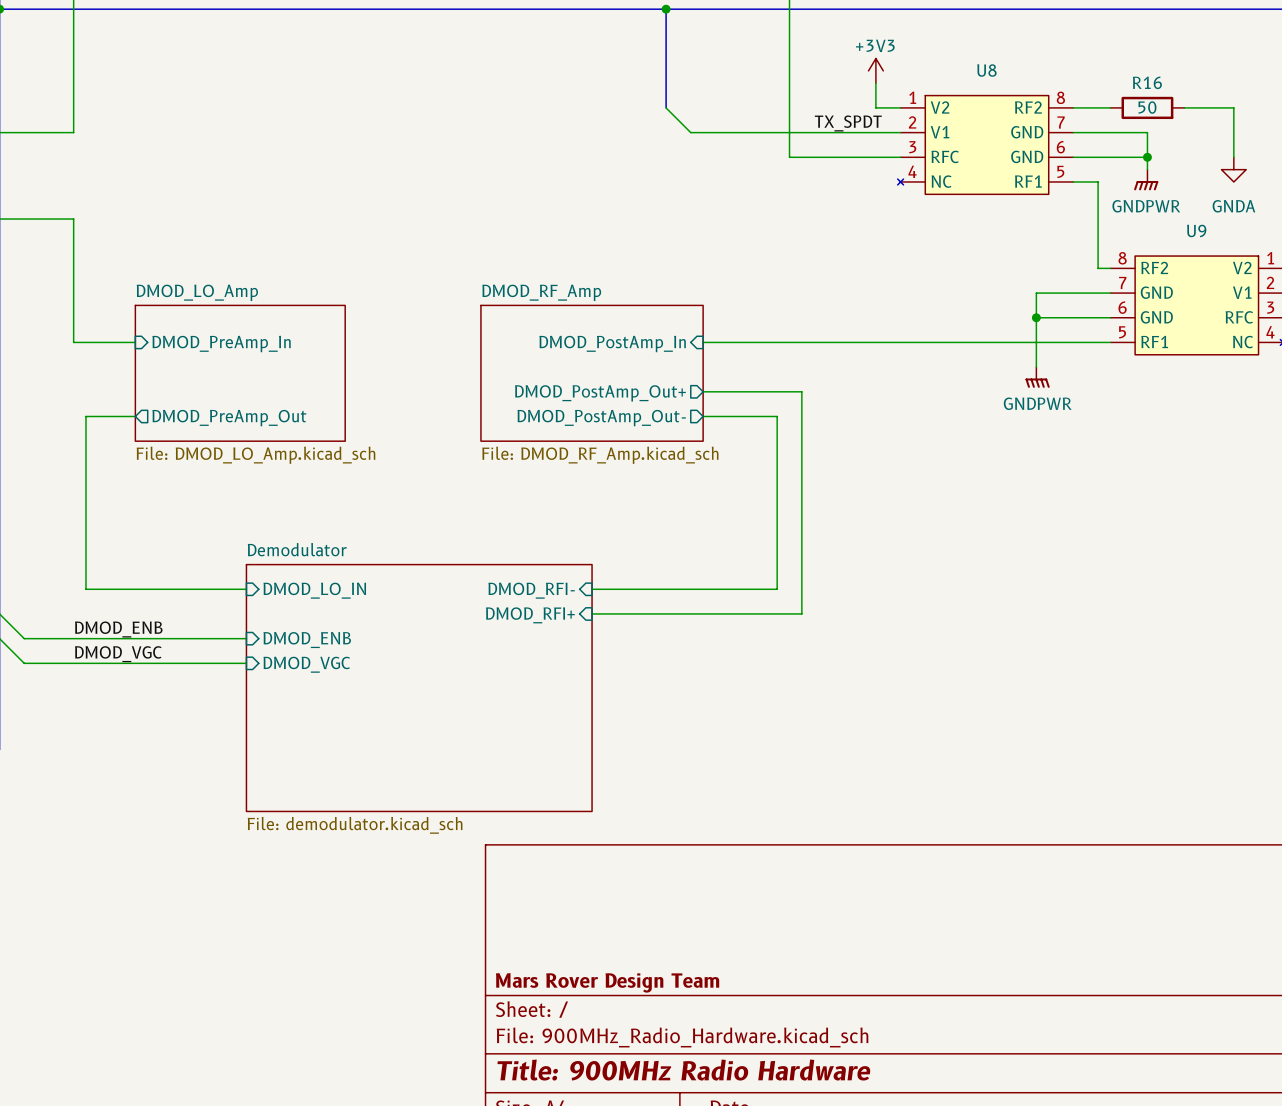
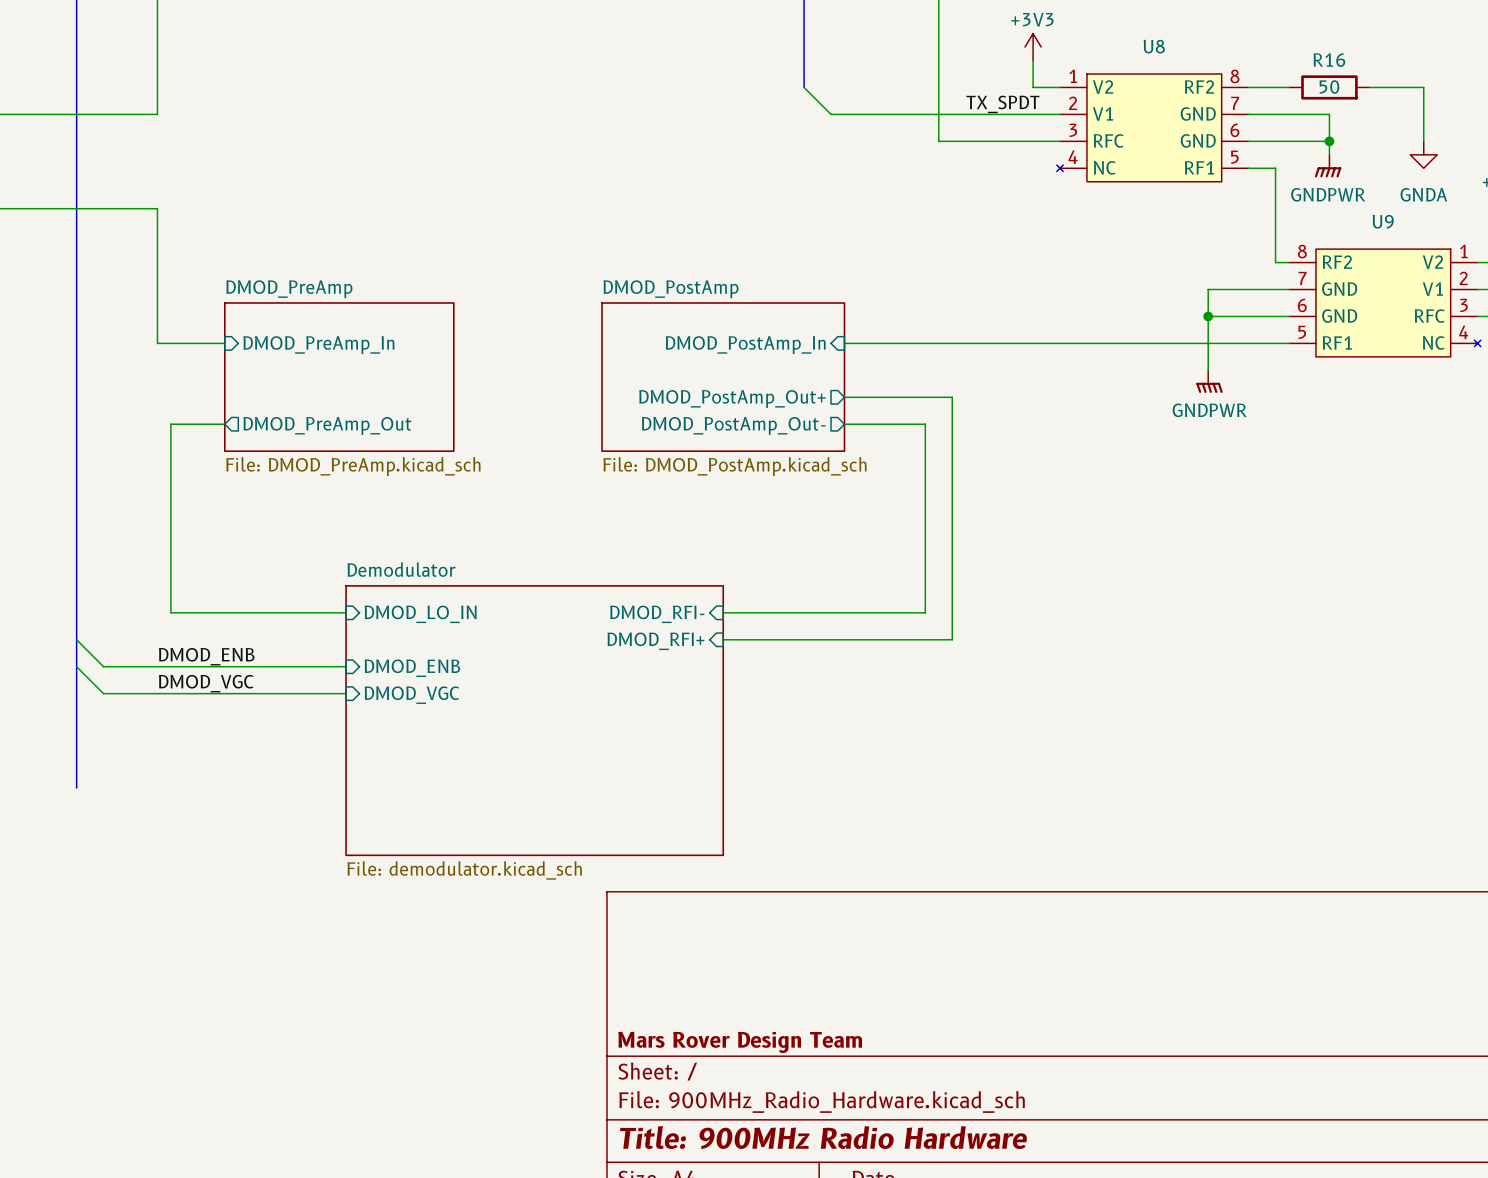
sheet DMOD_LO_Amp name: DMOD_LO_Amp (197, 292) -> DMOD_PreAmp (289, 289)
sheet DMOD_RF_Amp name: DMOD_RF_Amp (541, 292) -> DMOD_PostAmp (671, 289)
sheet DMOD_LO_Amp value: File: DMOD_LO_Amp.kicad_sch (255, 455) -> File: DMOD_PreAmp.kicad_sch (353, 466)
sheet DMOD_RF_Amp value: File: DMOD_RF_Amp.kicad_sch (600, 455) -> File: DMOD_PostAmp.kicad_sch (734, 466)

